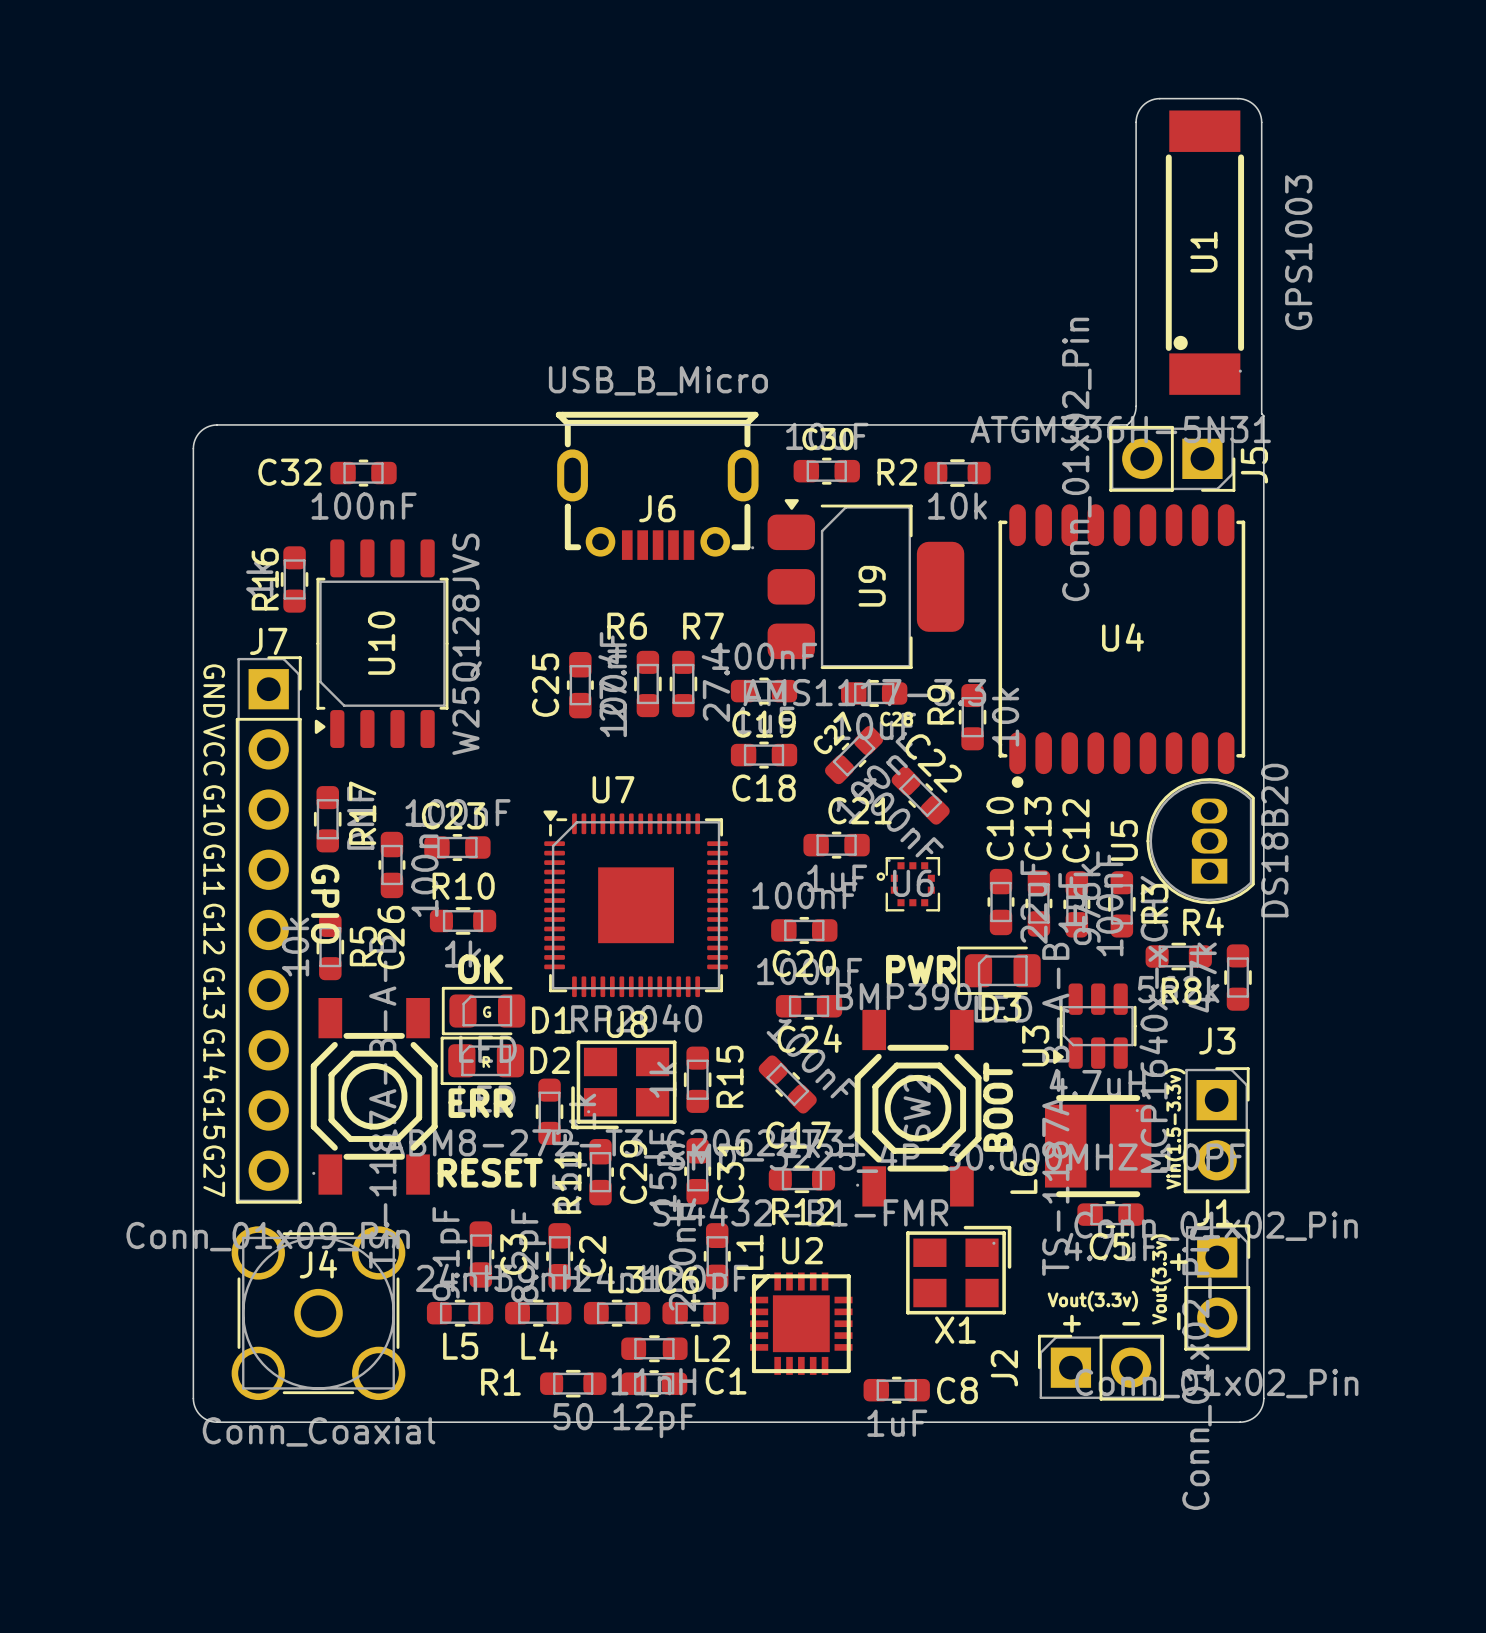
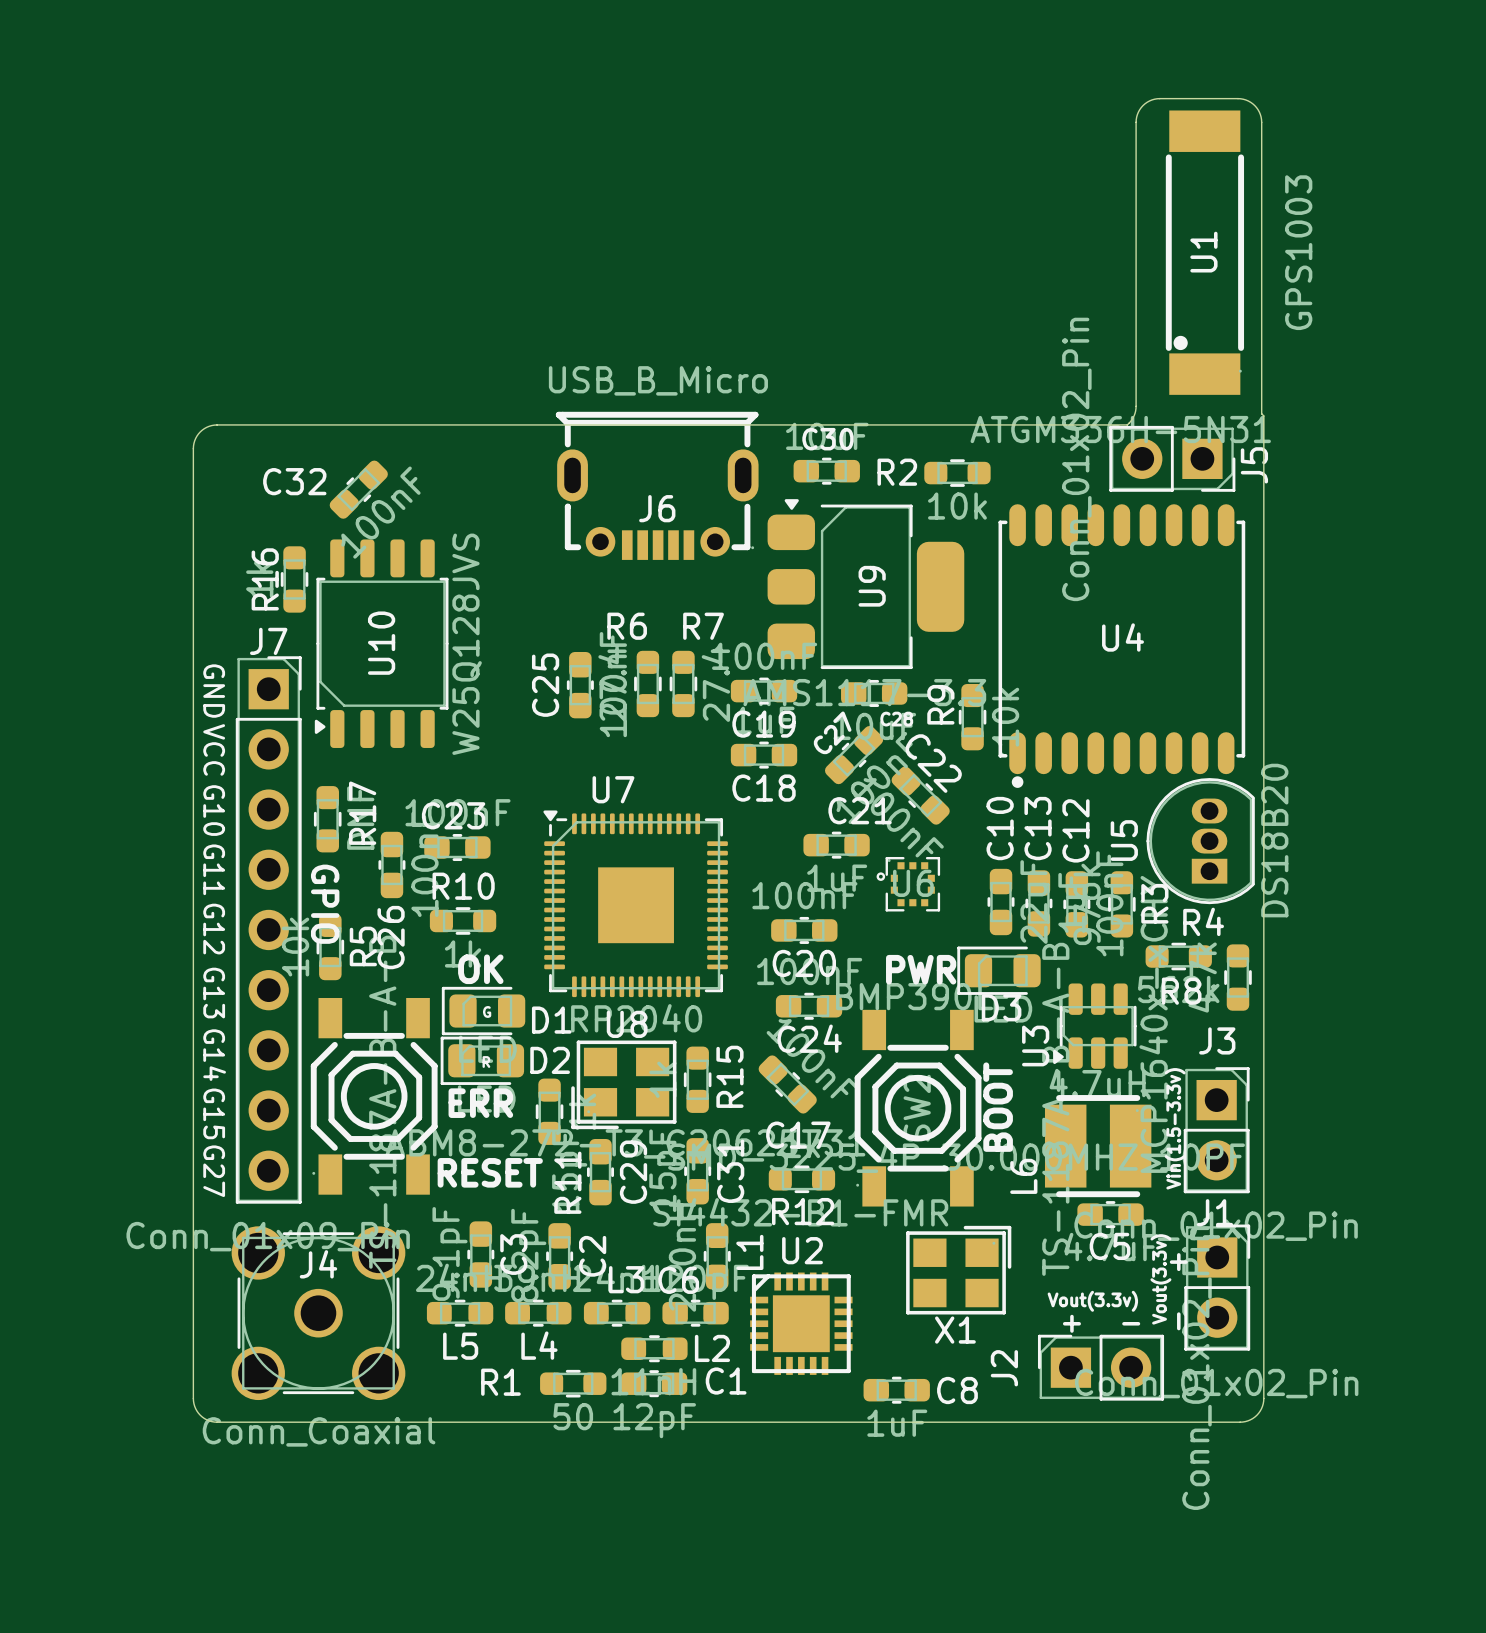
C32 rotation: 0° (363, 473) -> 45° counterclockwise (358, 489)

